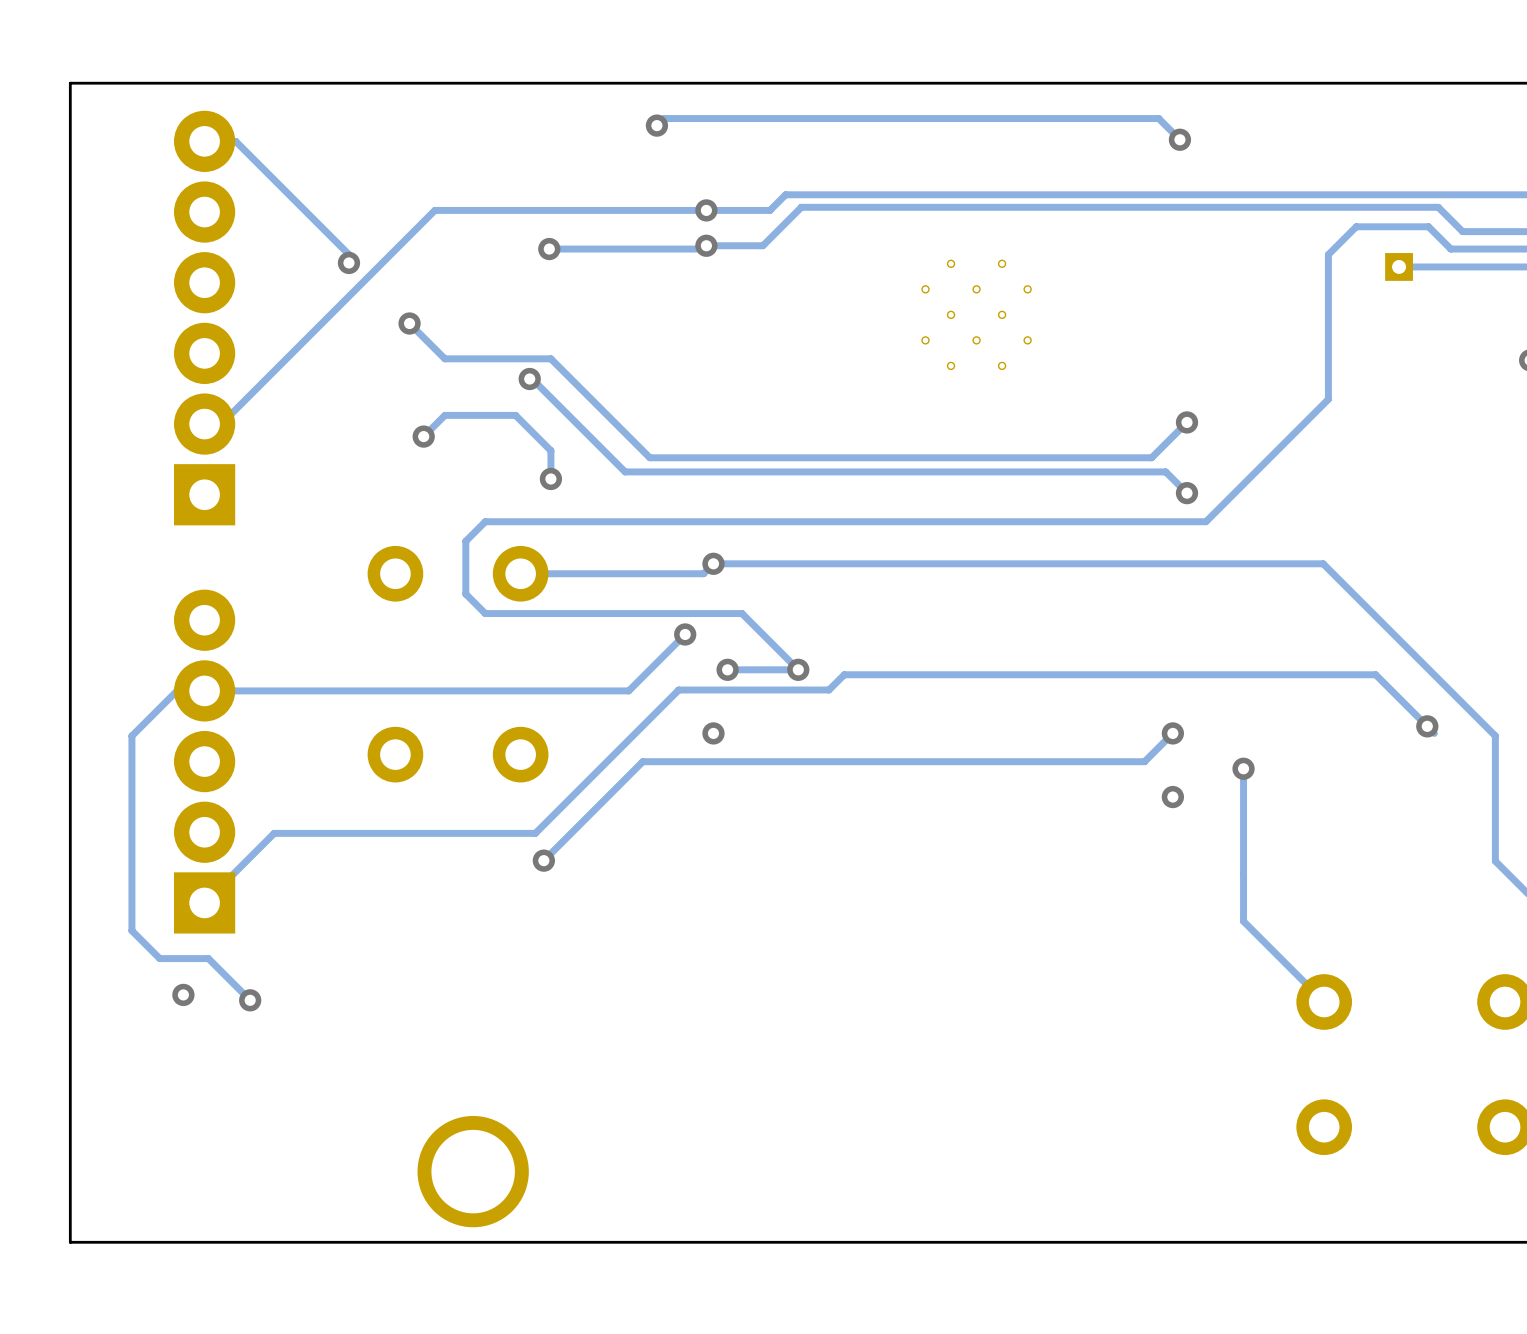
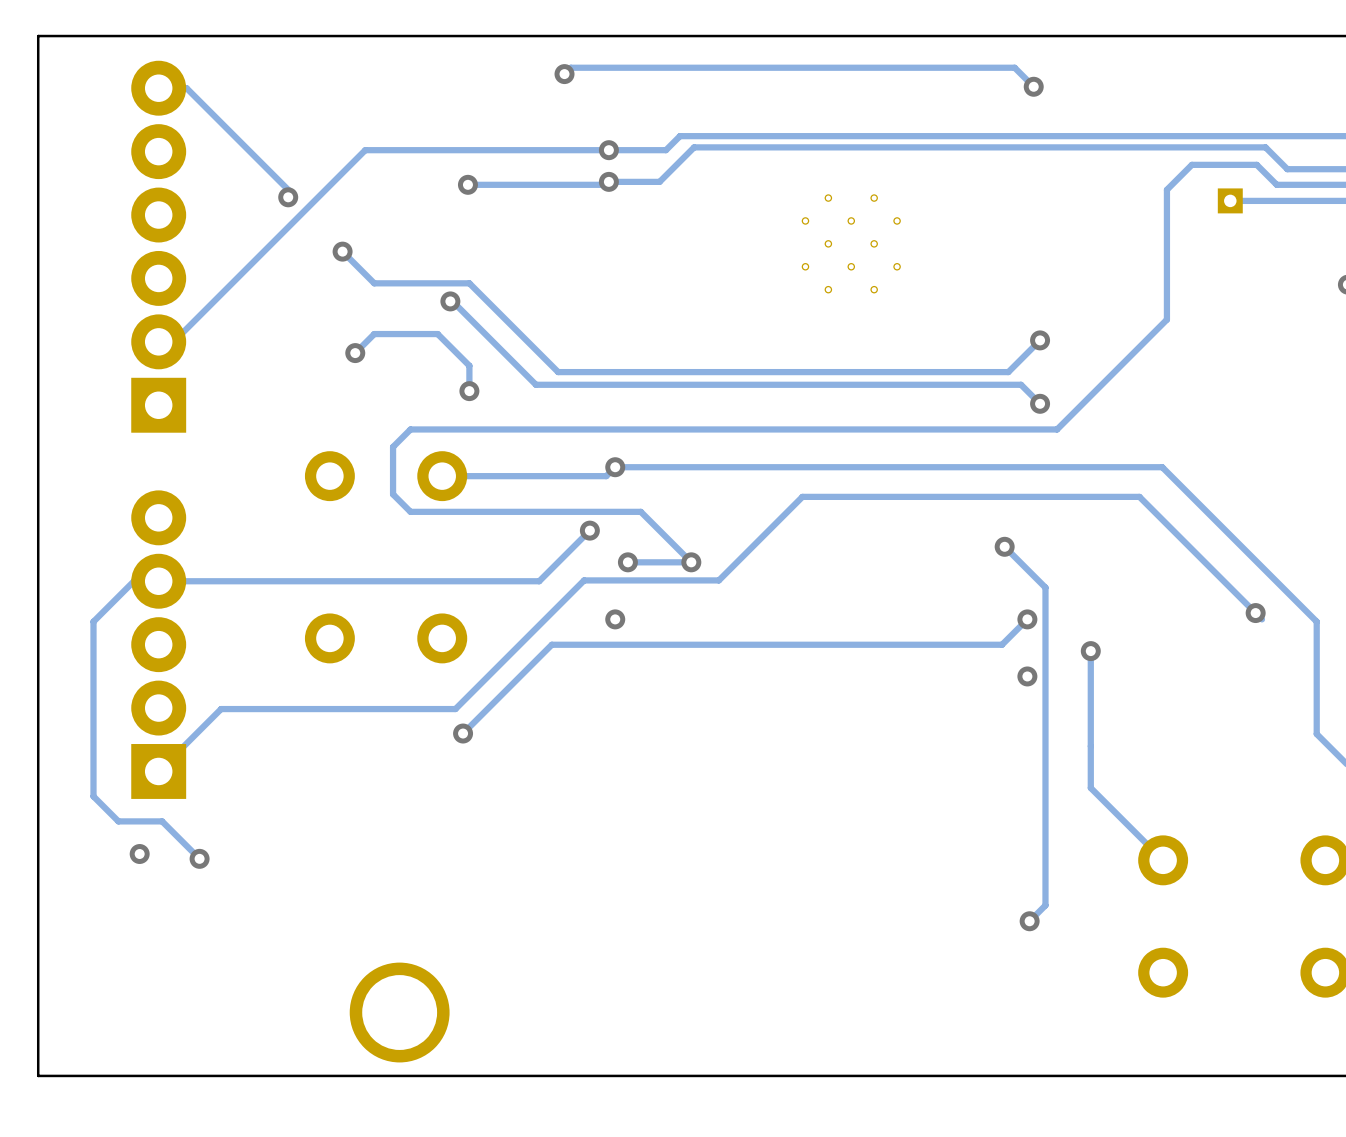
track: none -> (1004, 546) (1045, 587) (1045, 905) (1029, 921)
via: none -> (1004, 546)
track: (1375, 674) (844, 674) -> (1209, 566) (1139, 496) (802, 496) (732, 566)
via: none -> (1029, 921)

